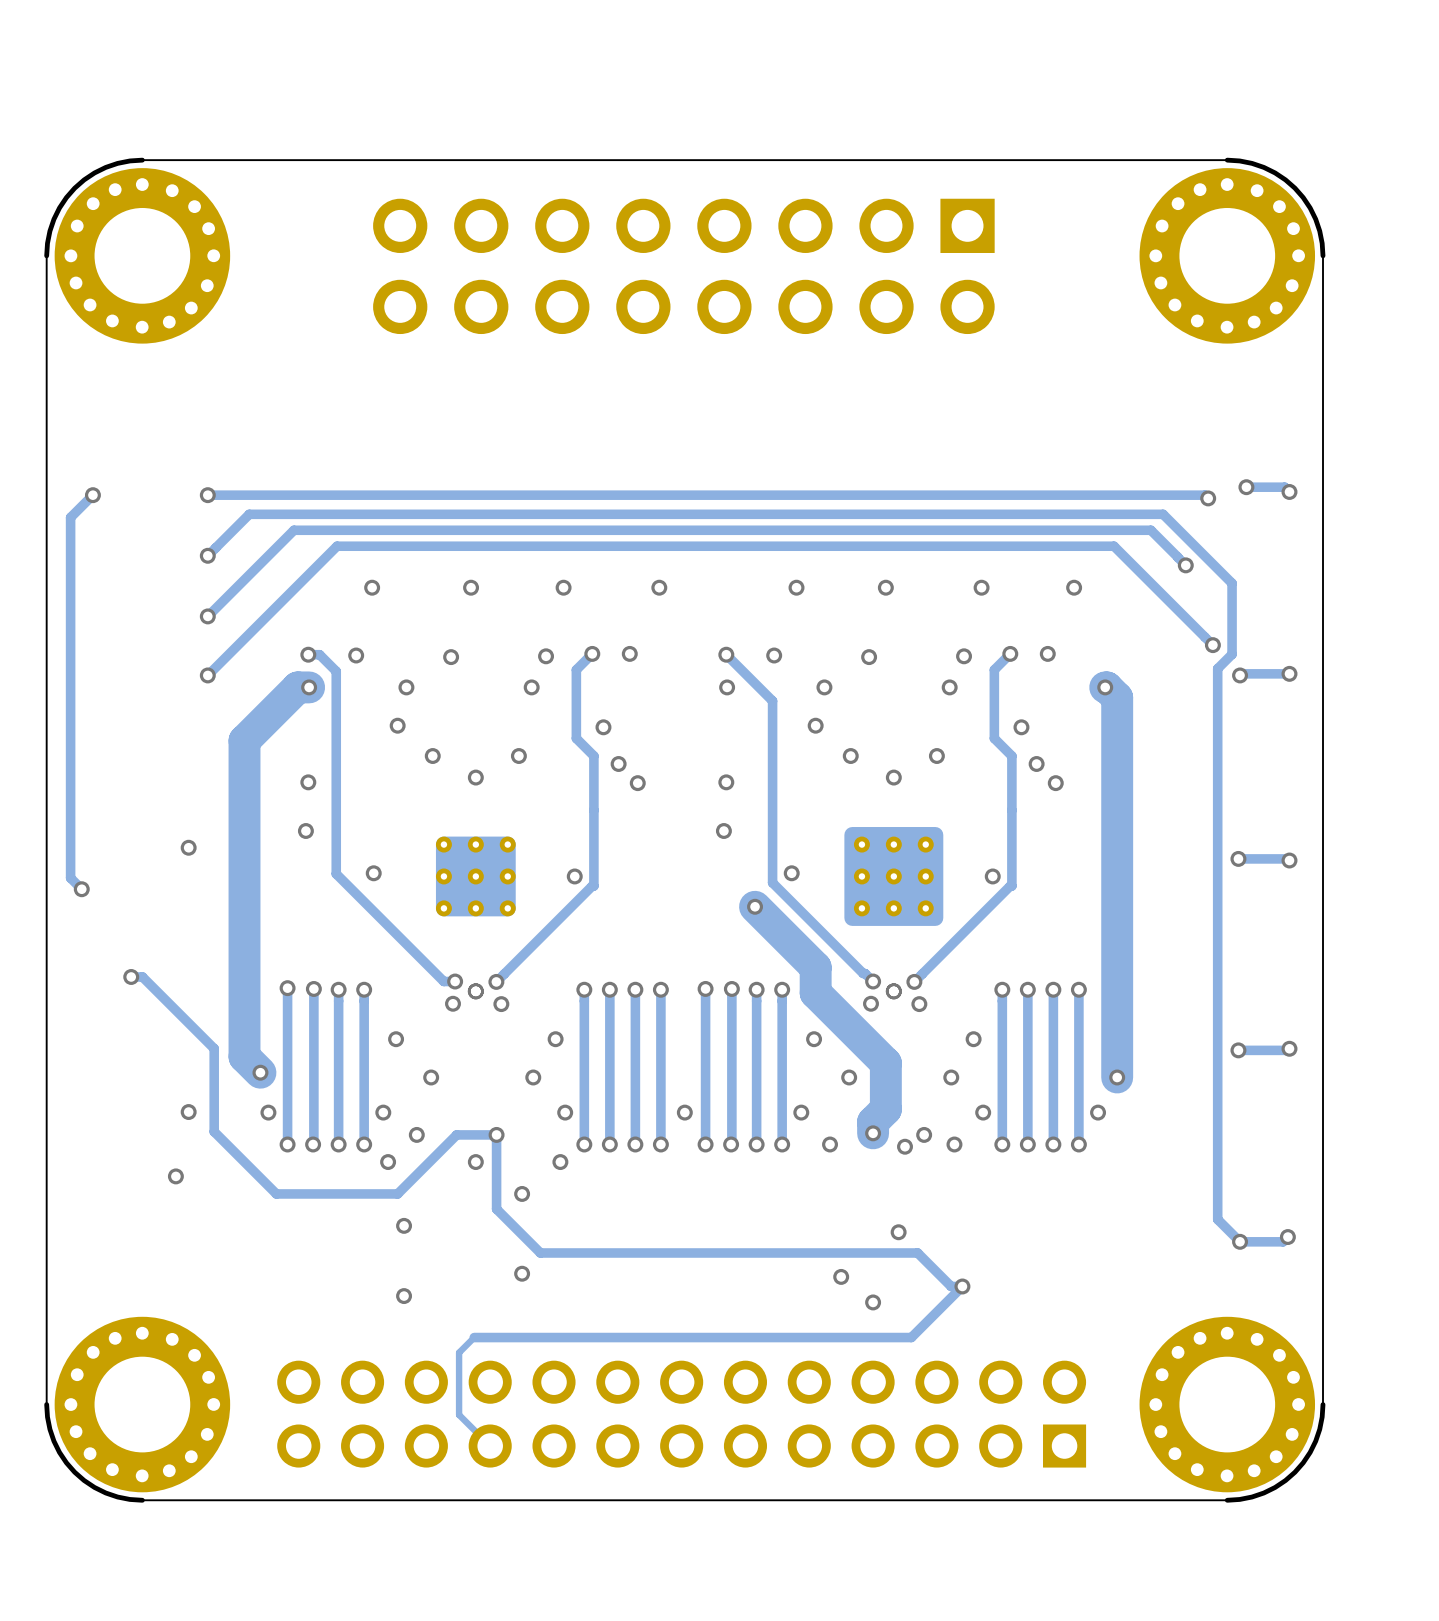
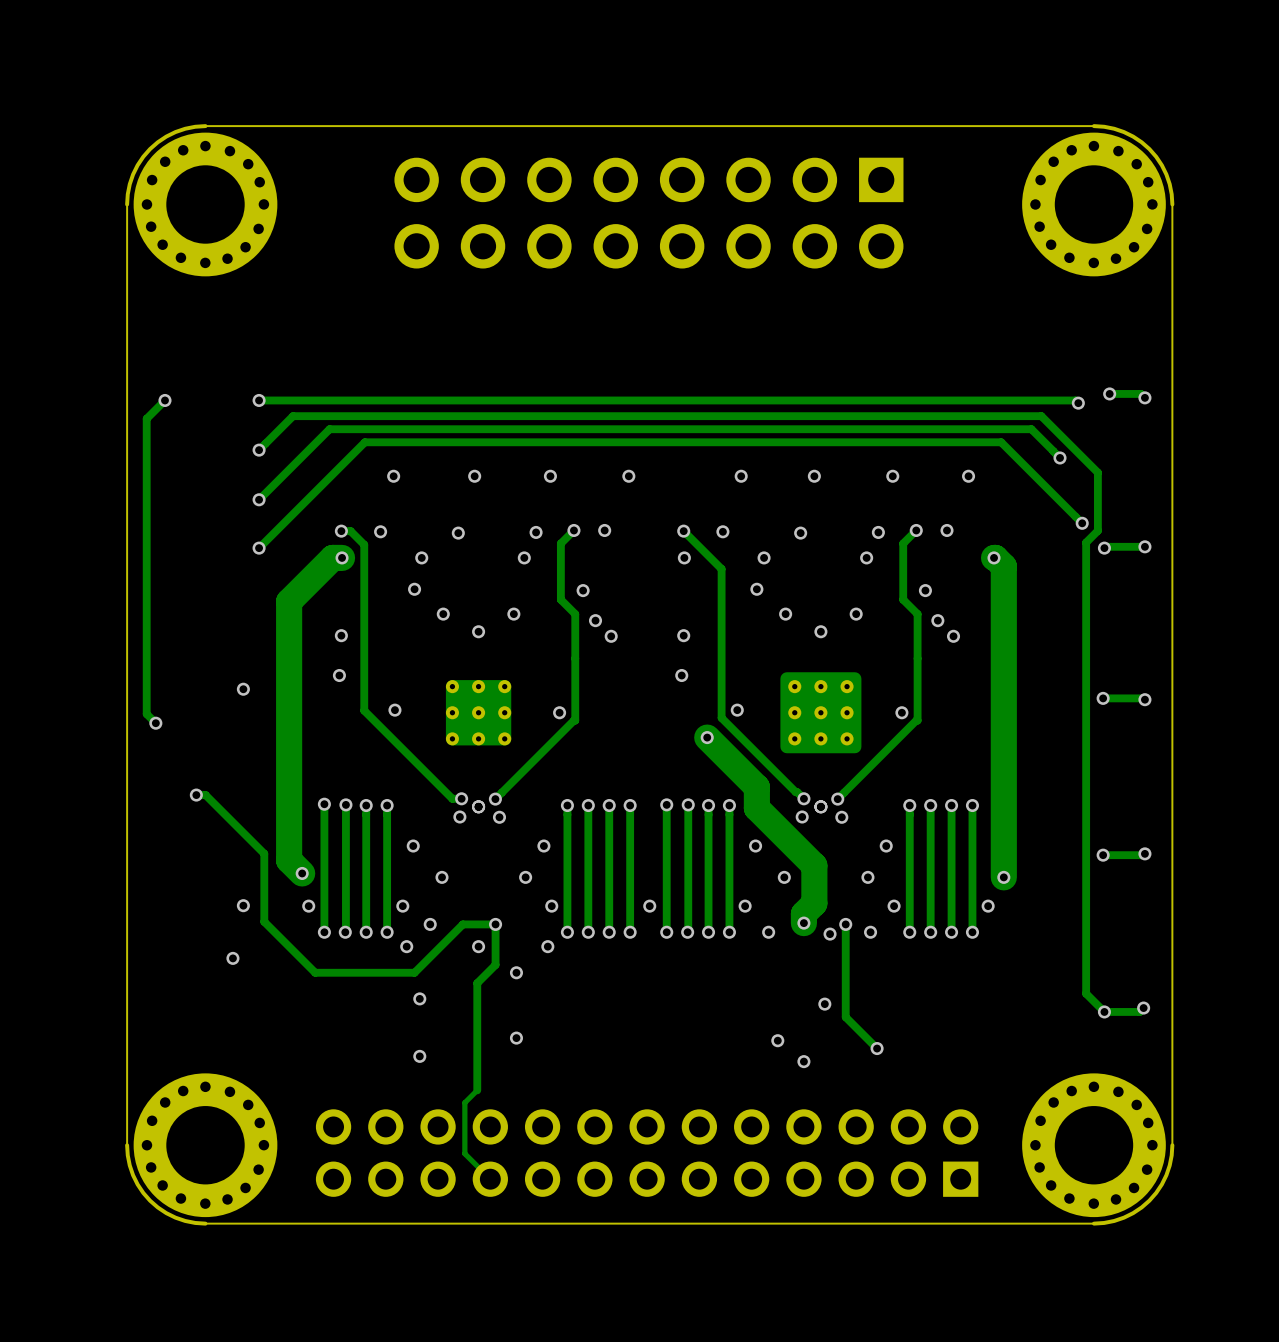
track: none -> (845, 924) (845, 1017) (877, 1048)
track: (496, 1184) (496, 1209) (540, 1252) (917, 1252) (951, 1286) (962, 1286) (911, 1337) (474, 1337) -> (495, 964) (477, 983) (477, 1090)

